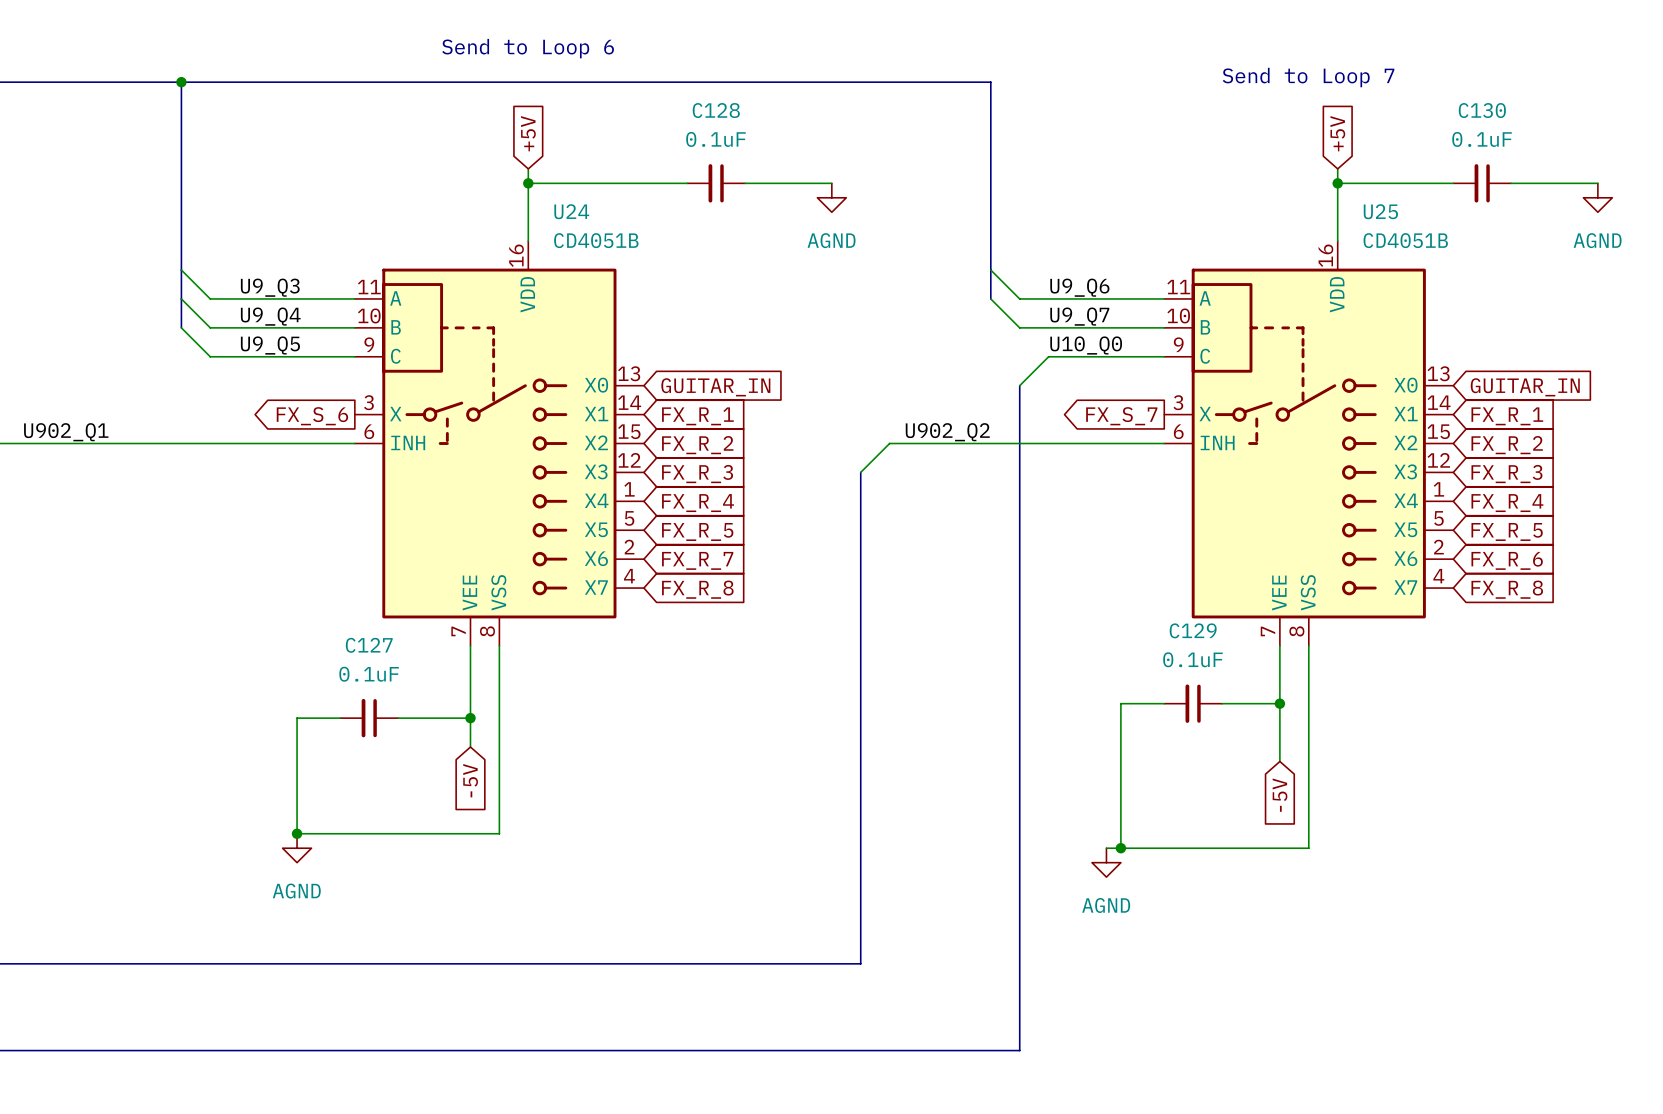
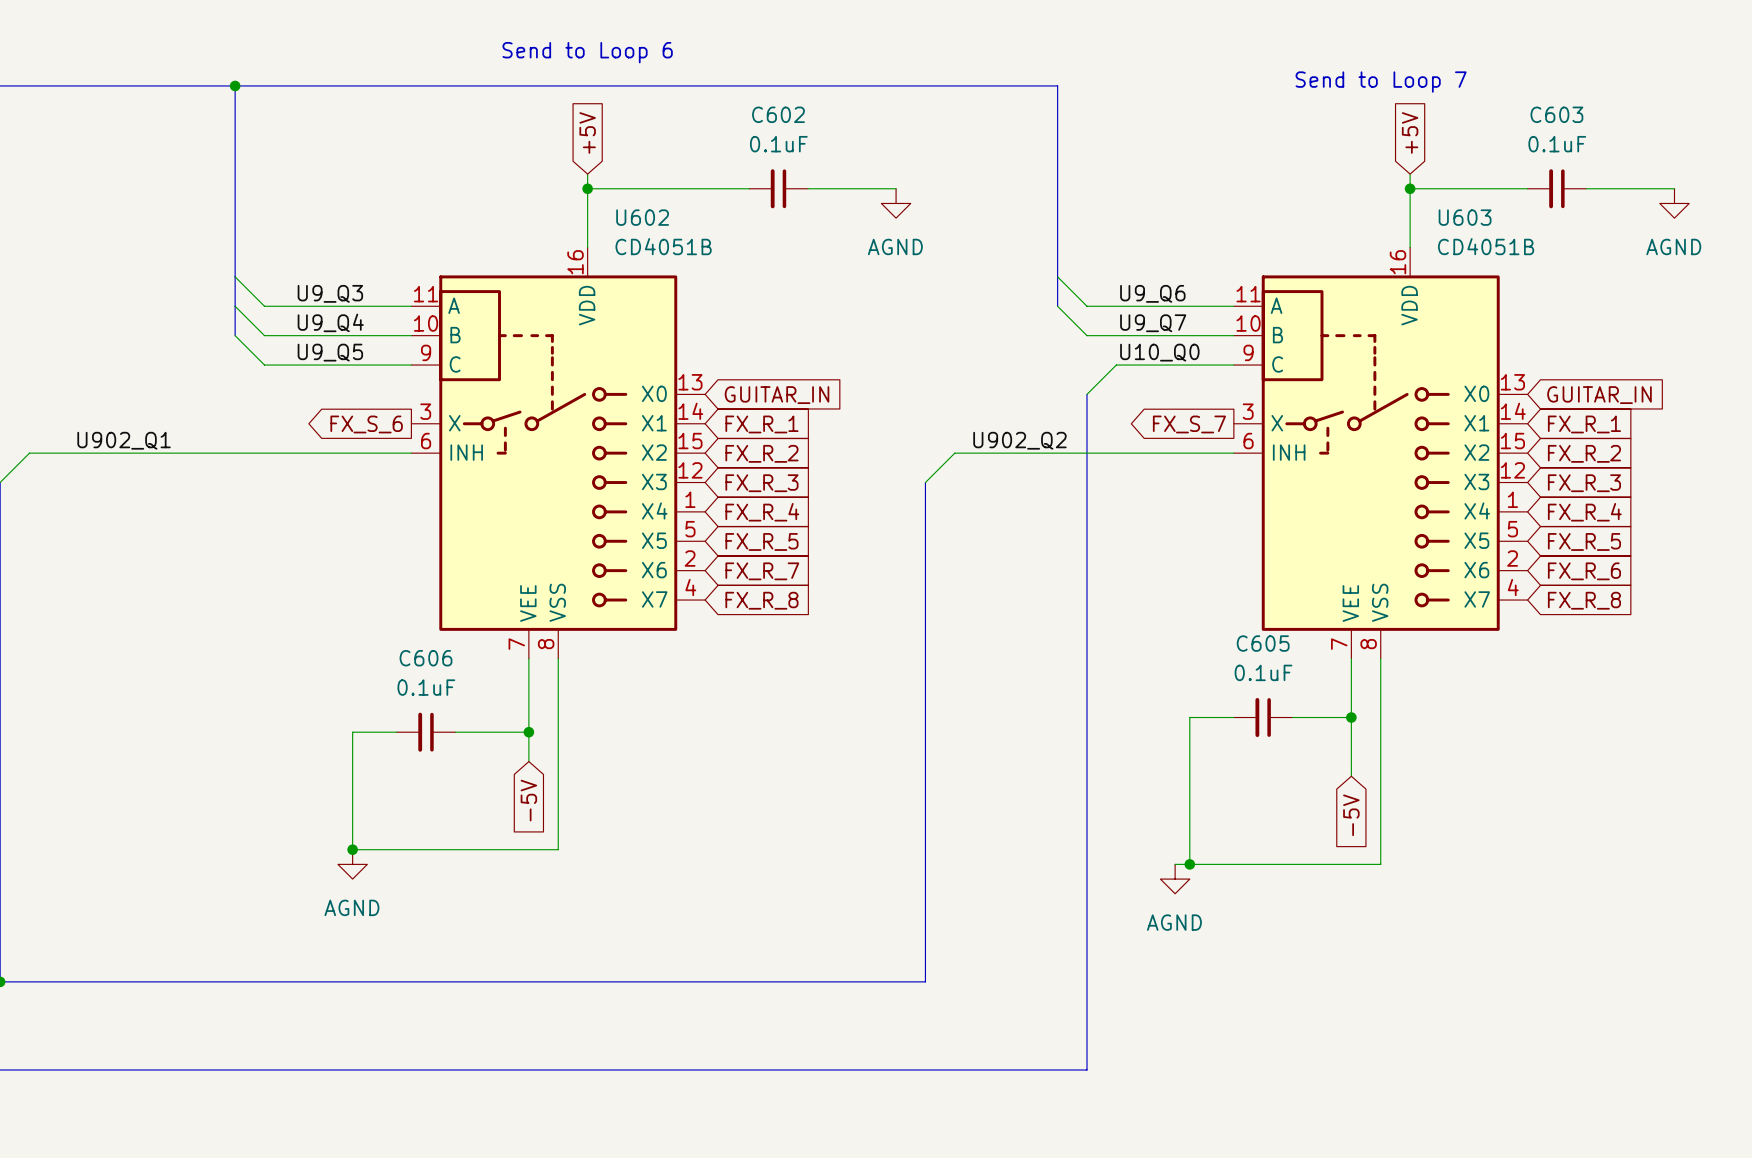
C128 name: C128 (716, 110) -> C602 (778, 114)
C130 name: C130 (1482, 110) -> C603 (1556, 114)
U24 name: U24 (571, 211) -> U602 (642, 217)
U25 name: U25 (1380, 211) -> U603 (1465, 217)
C129 name: C129 (1193, 630) -> C605 (1263, 643)
C127 name: C127 (369, 645) -> C606 (426, 658)

